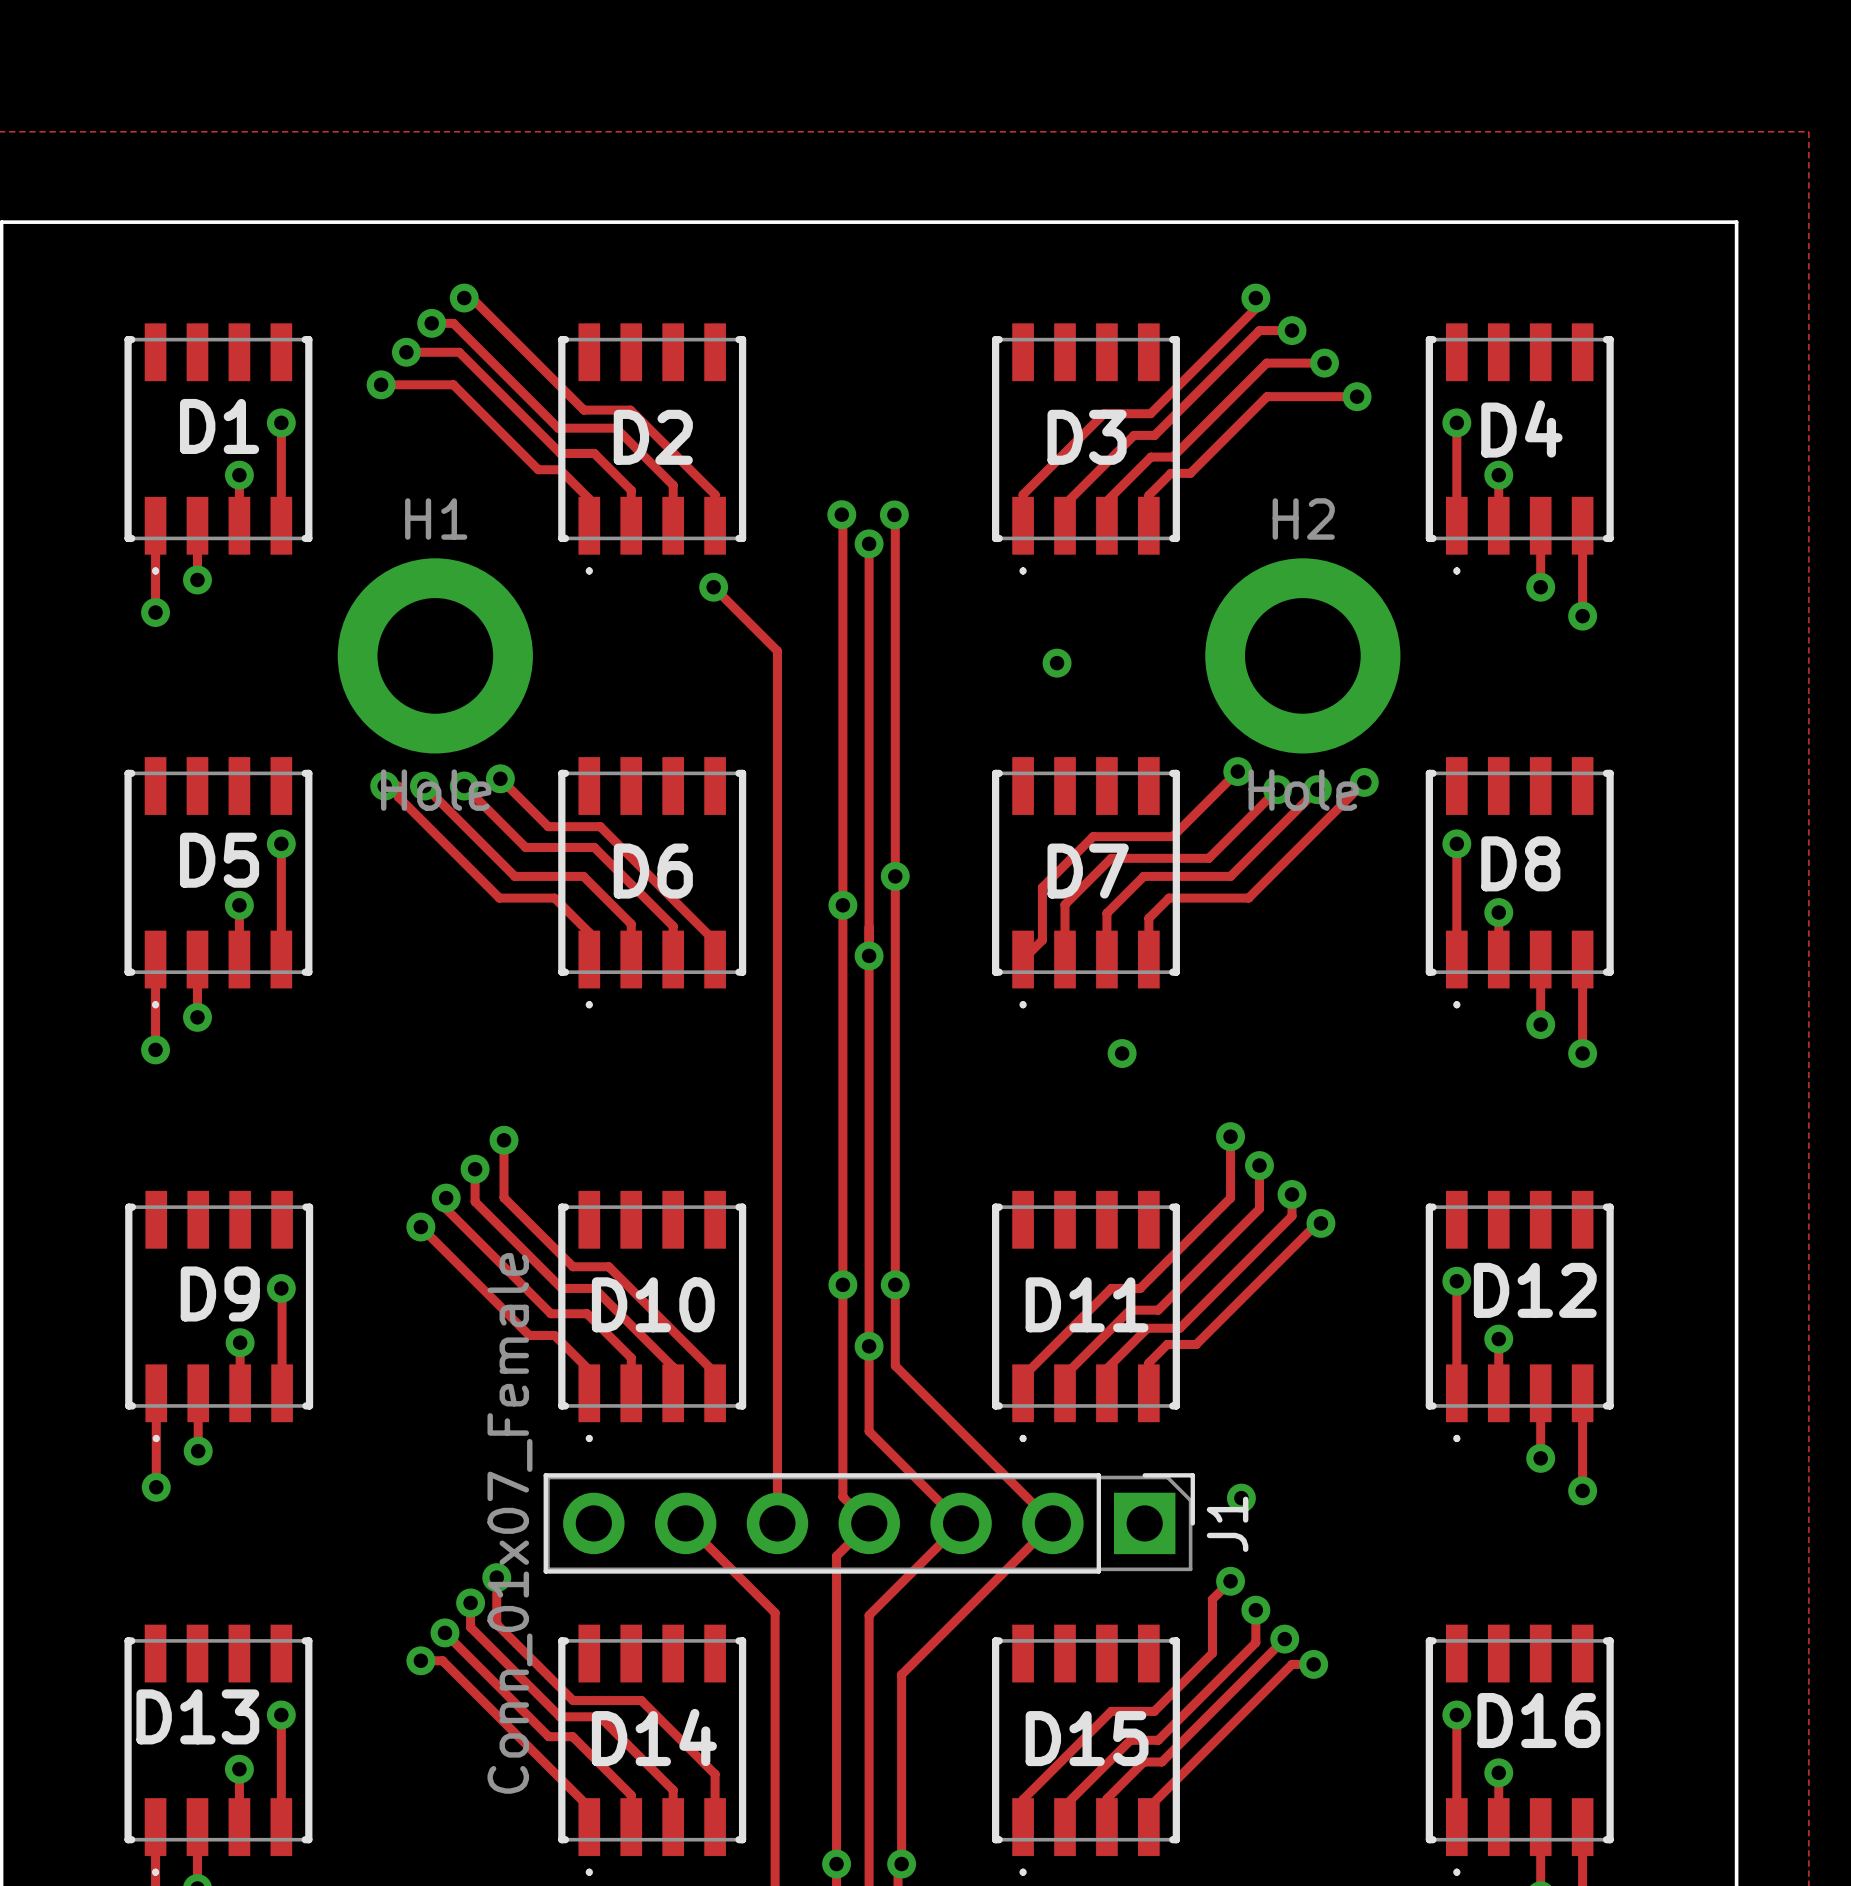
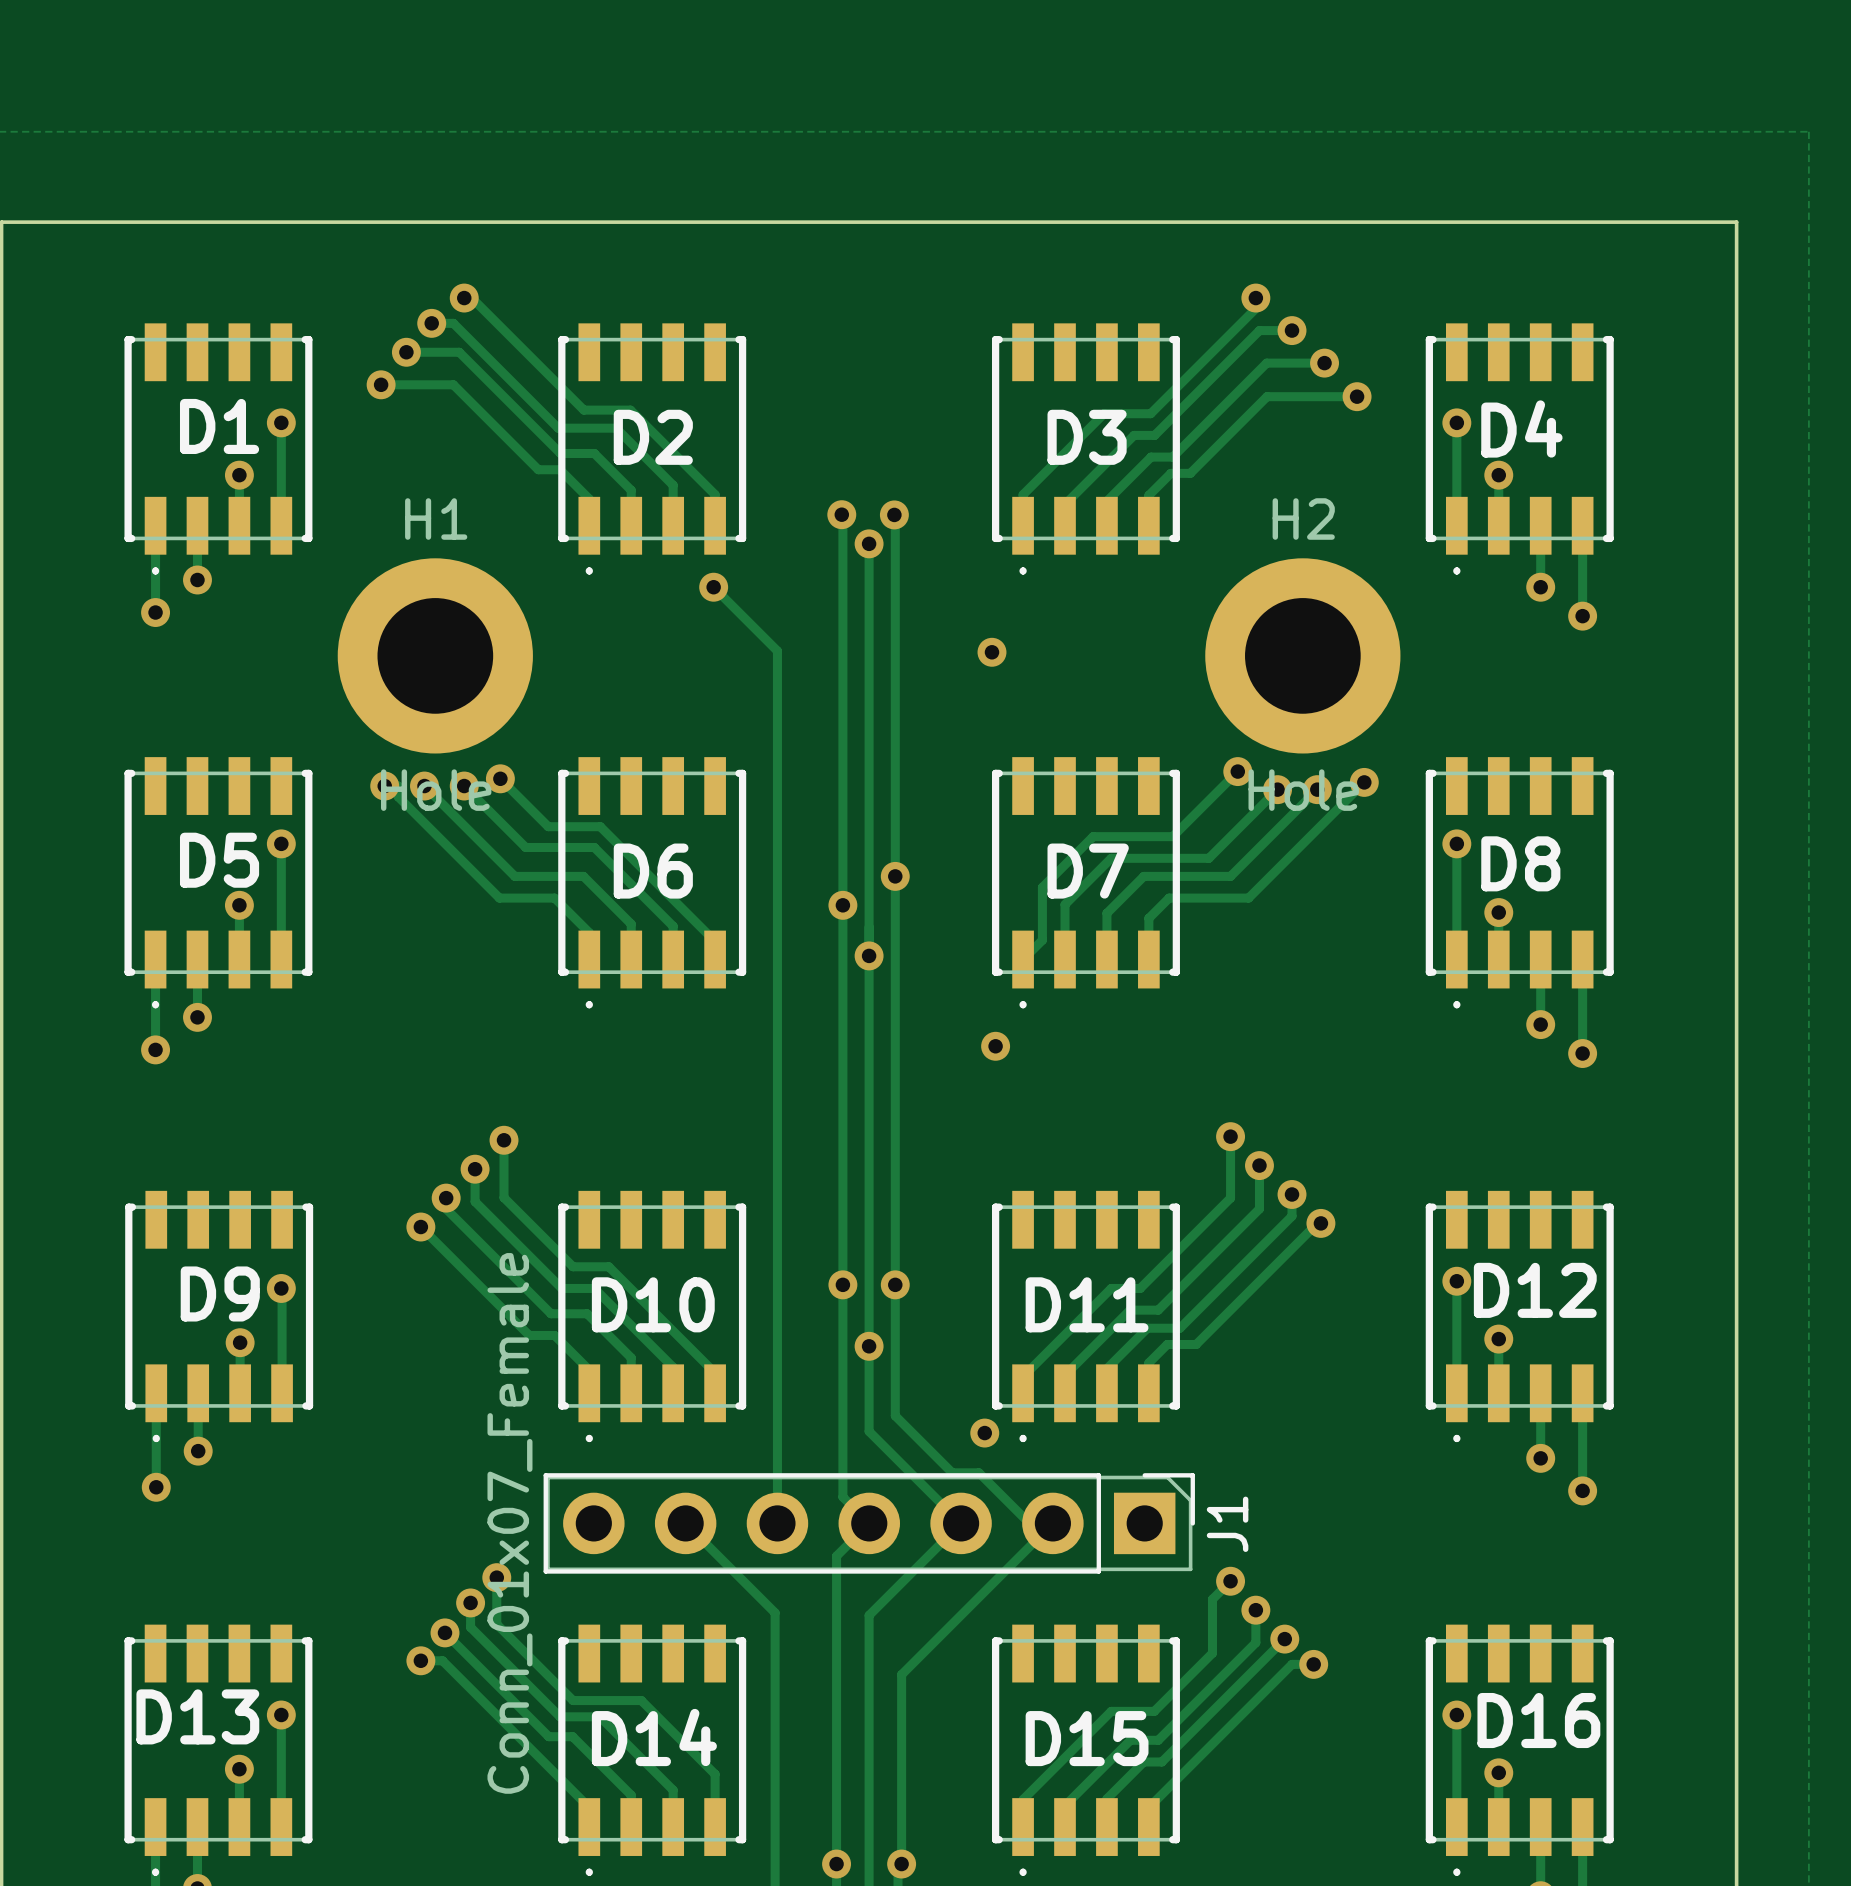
via position: (1057, 663) -> (991, 652)
via position: (1122, 1053) -> (995, 1046)
track: (895, 1365) (1052, 1523) -> (895, 1365) (895, 1415) (952, 1472) (978, 1472) (1029, 1523) (1052, 1523)
via: none -> (984, 1433)
via: (1241, 1498) -> none

